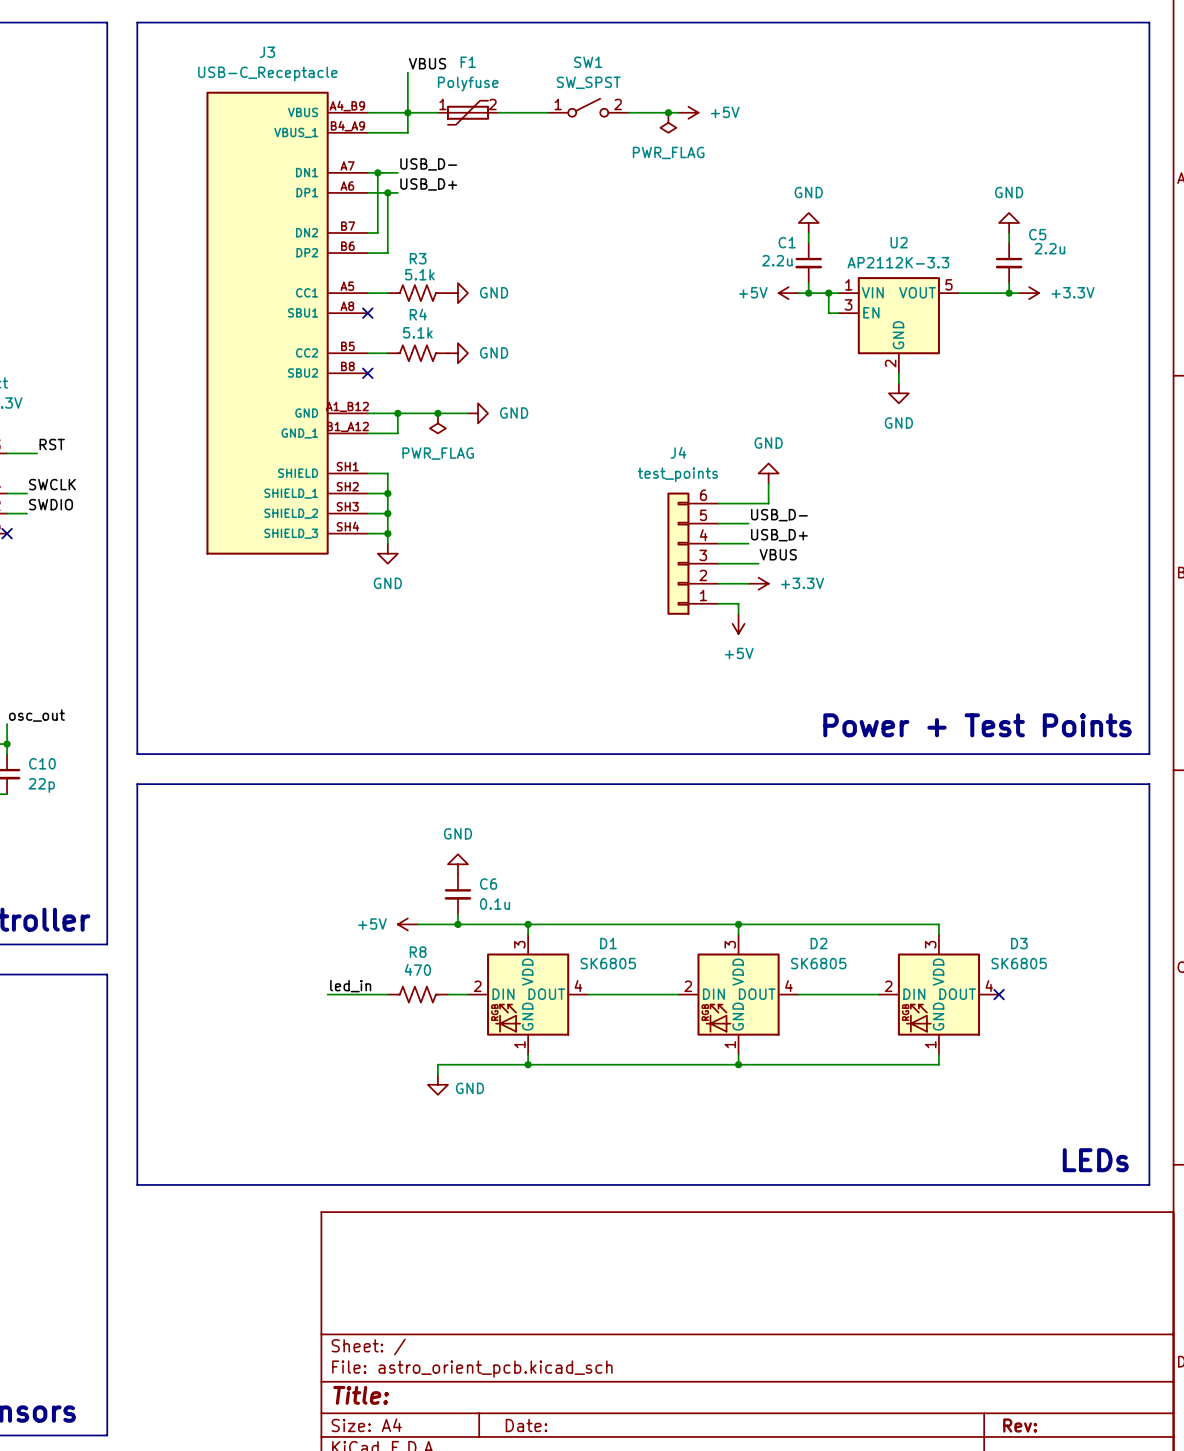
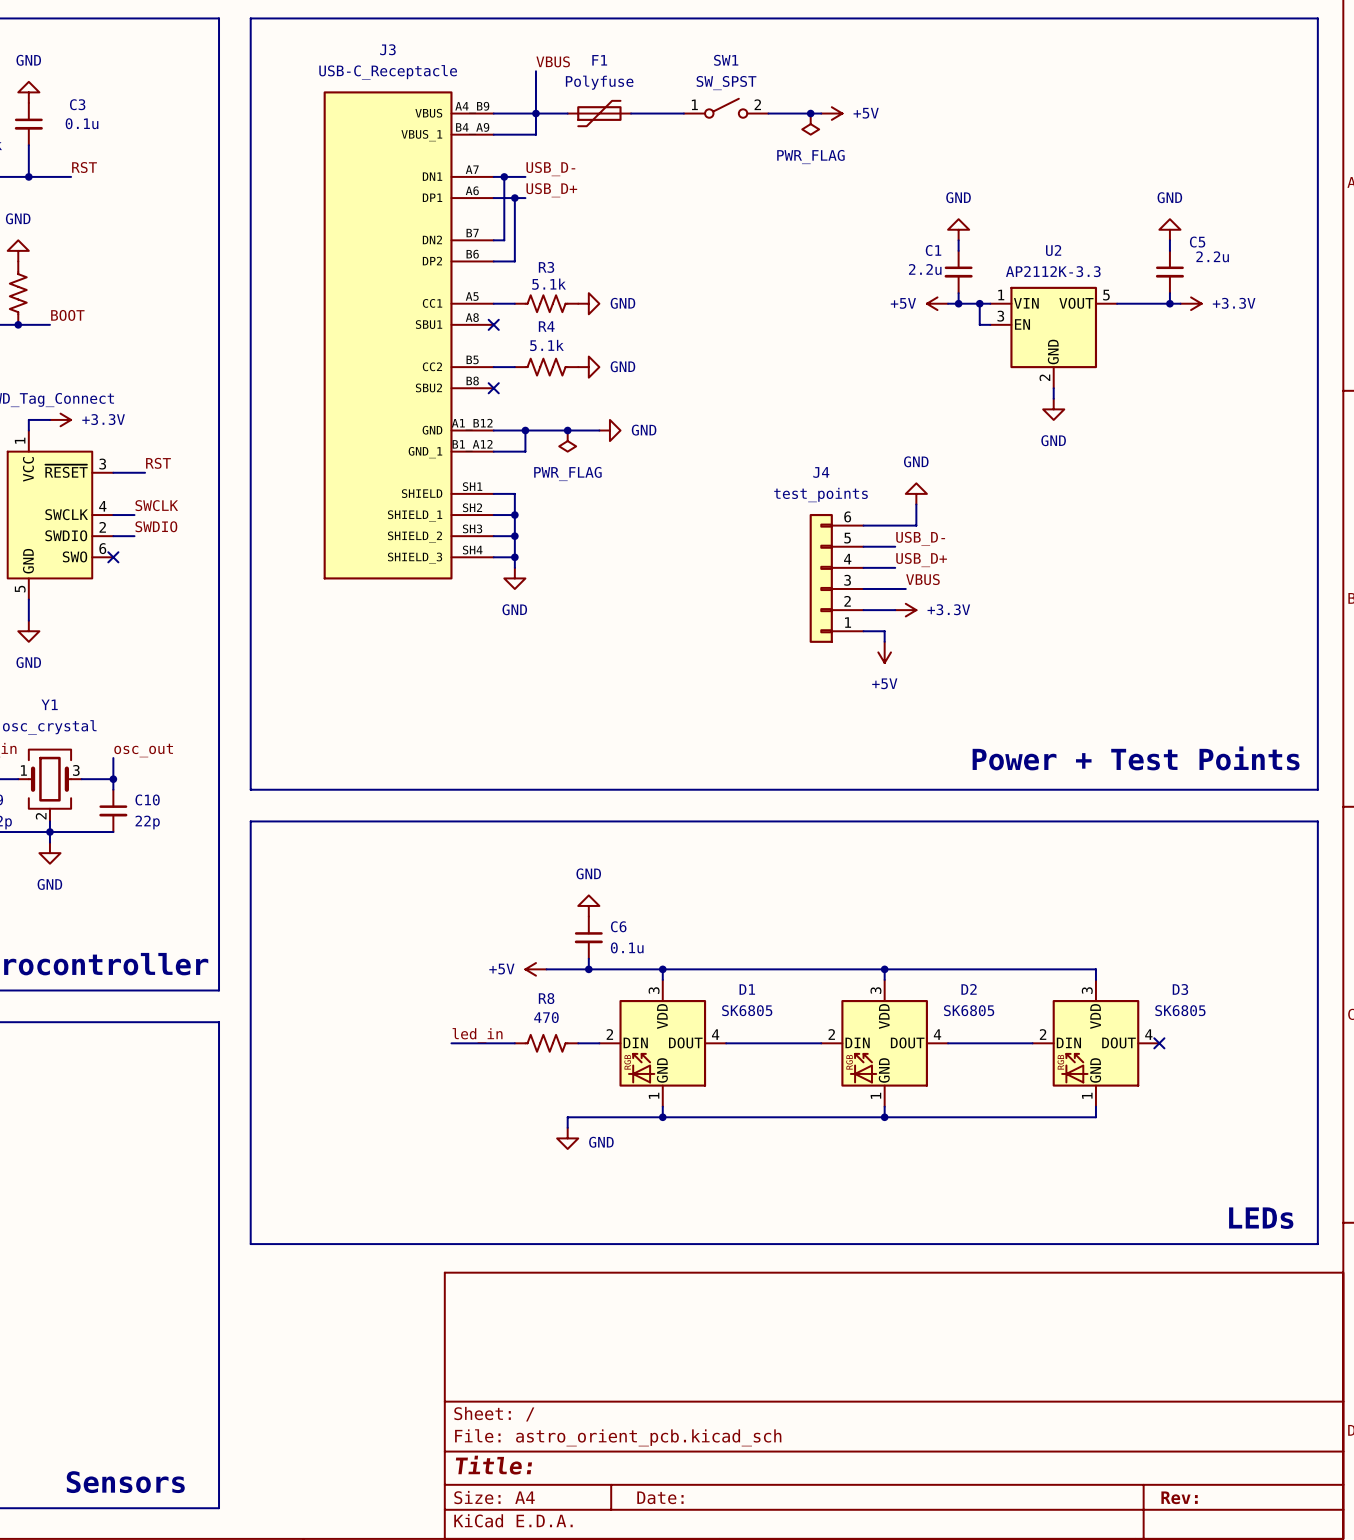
F1 pin number: 1 (442, 104) -> none
F1 pin number: 2 (492, 104) -> none

